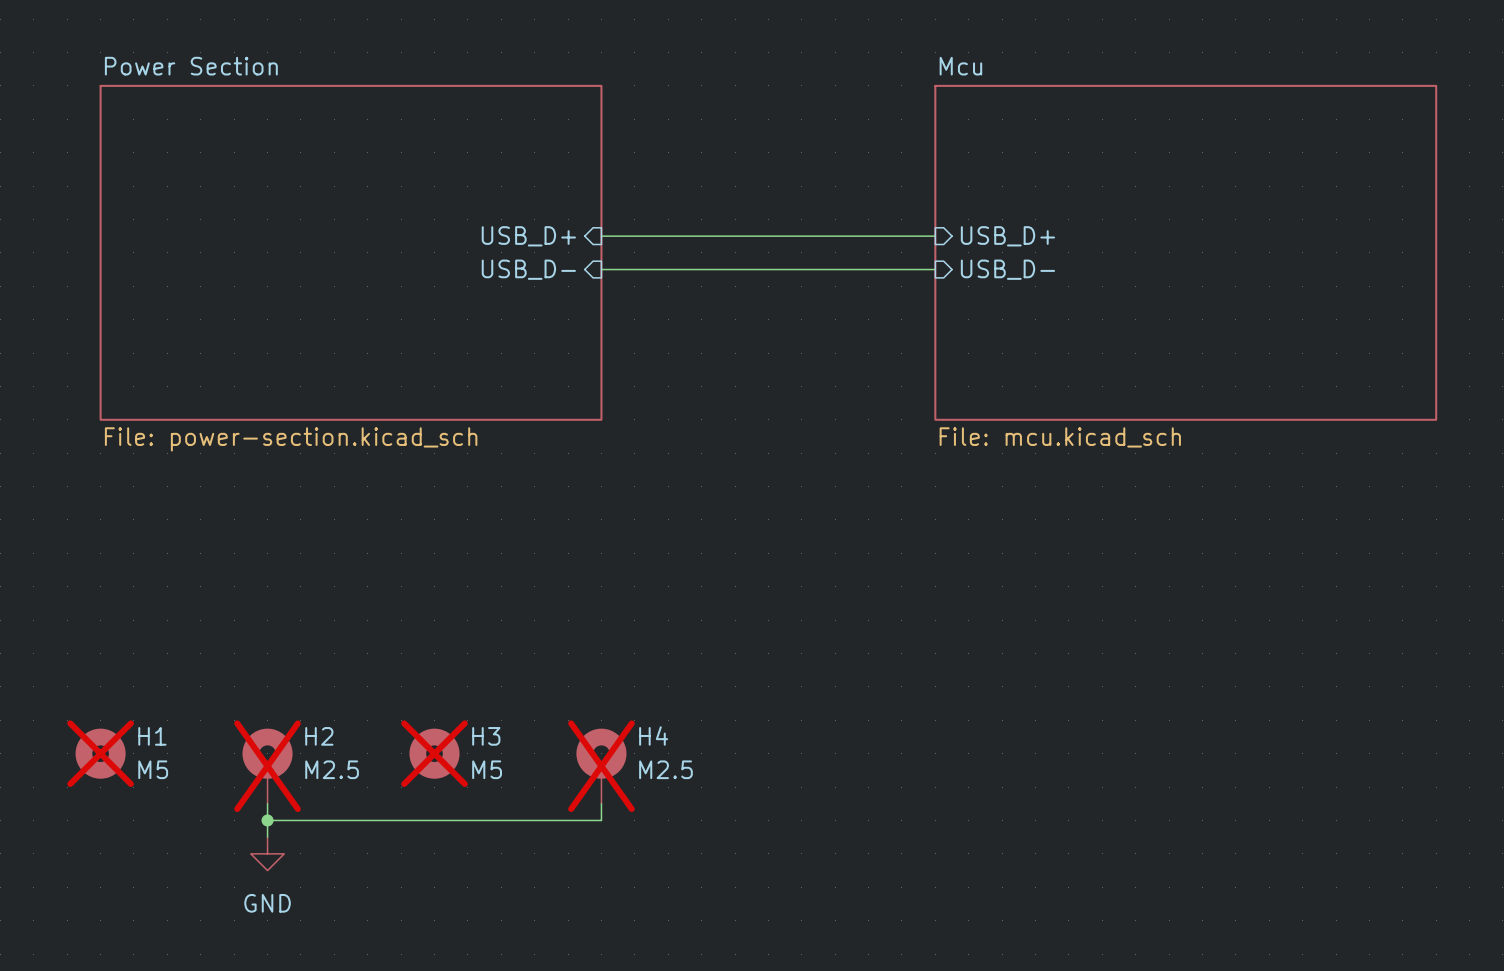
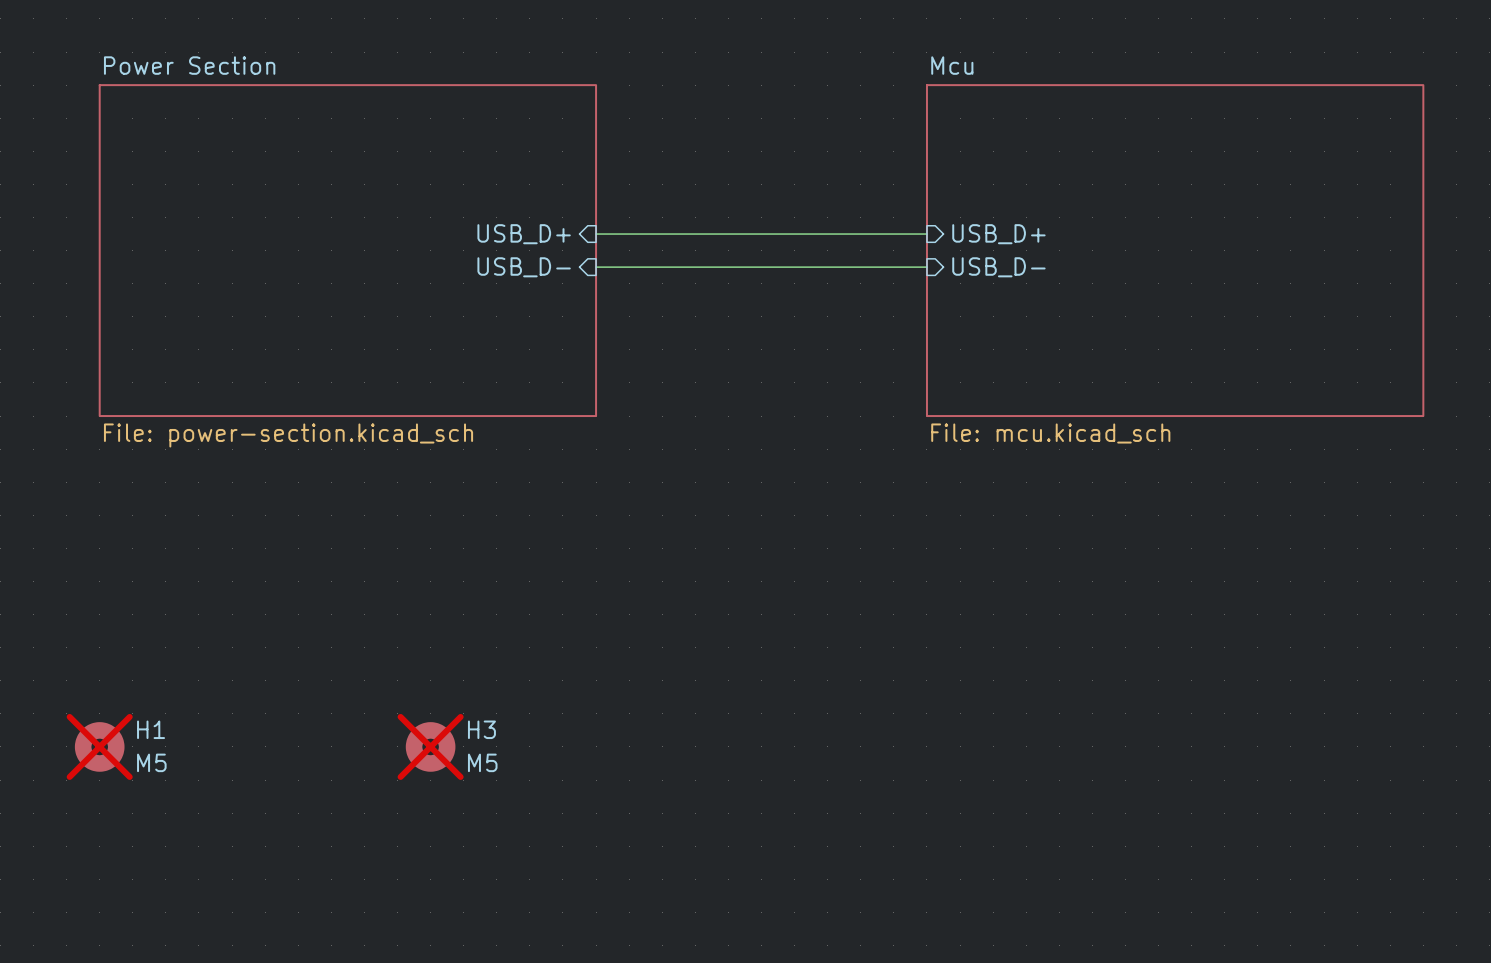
H2: M2.5 (267, 766) -> none
H4: M2.5 (601, 766) -> none
wire: (267, 803) (267, 837) -> none
wire: (601, 803) (601, 820) (267, 820) -> none
junction: (267, 820) -> none
power symbol: GND (267, 853) -> none

